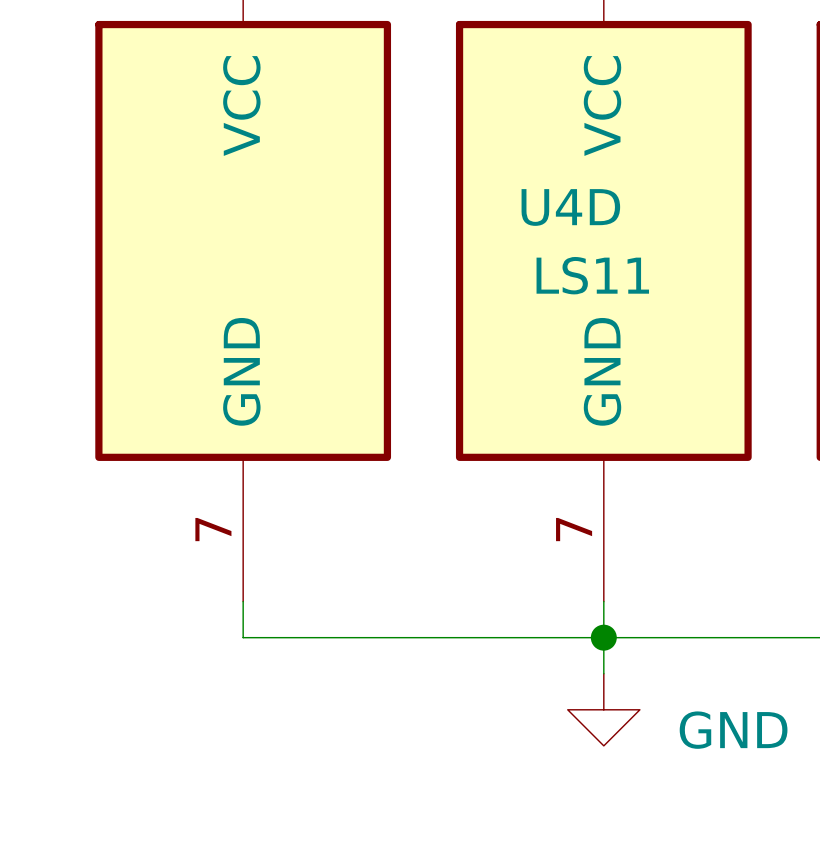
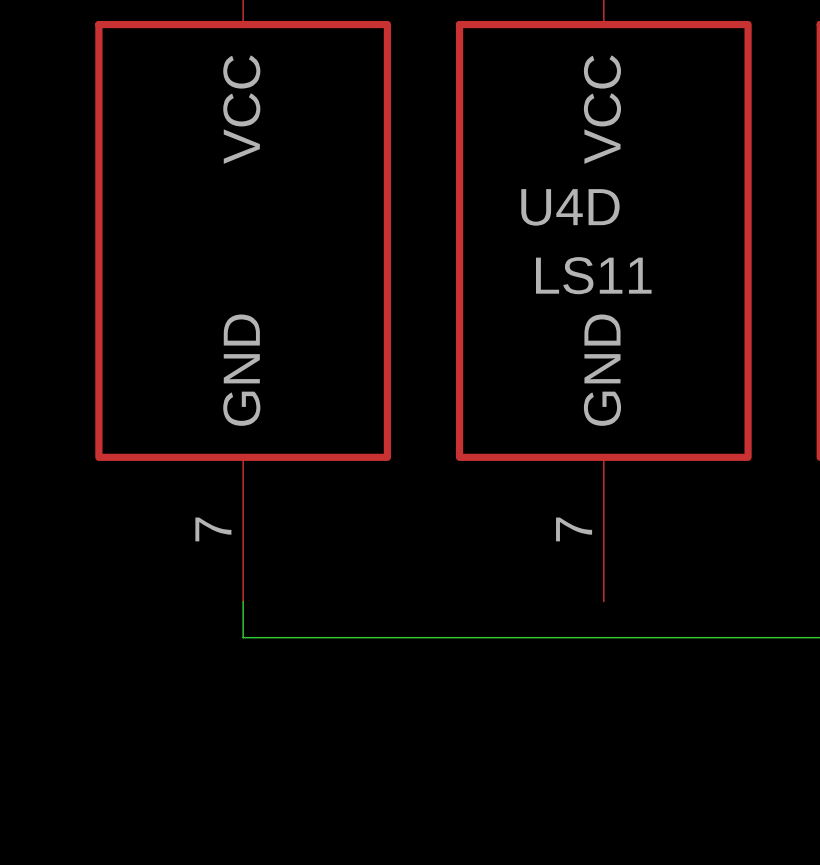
wire: (603, 601) (603, 673) -> none
junction: (603, 637) -> none
power symbol: GND (603, 709) -> none

